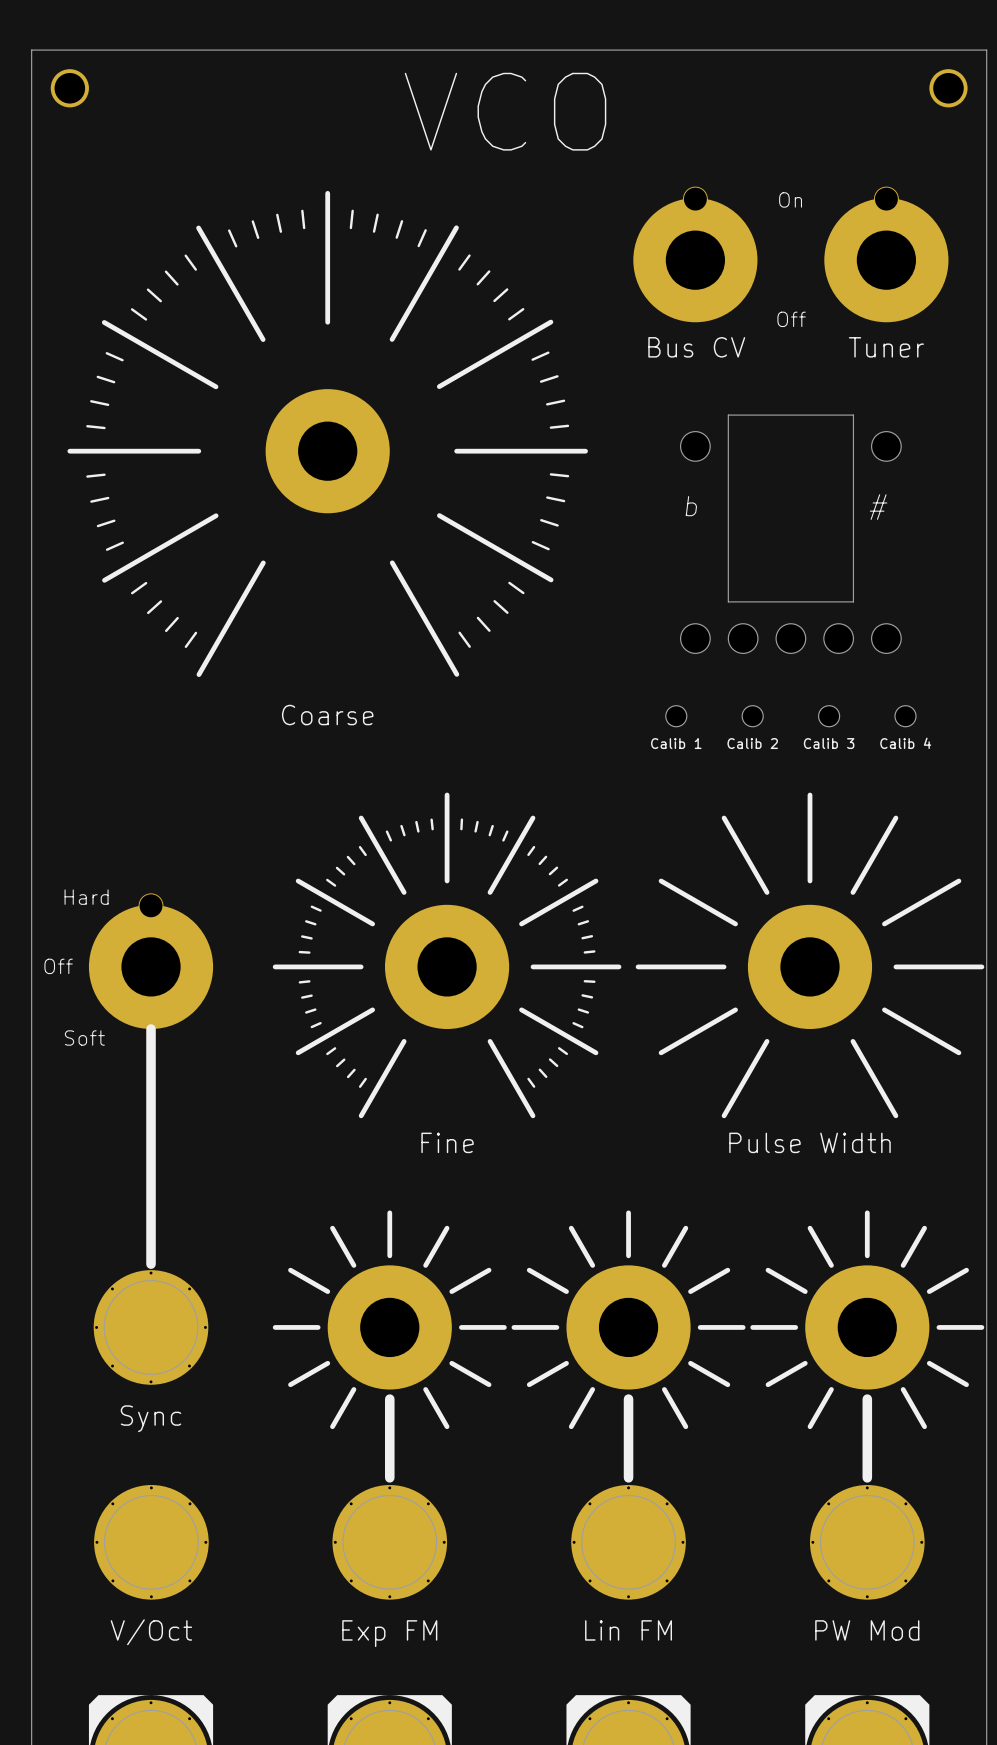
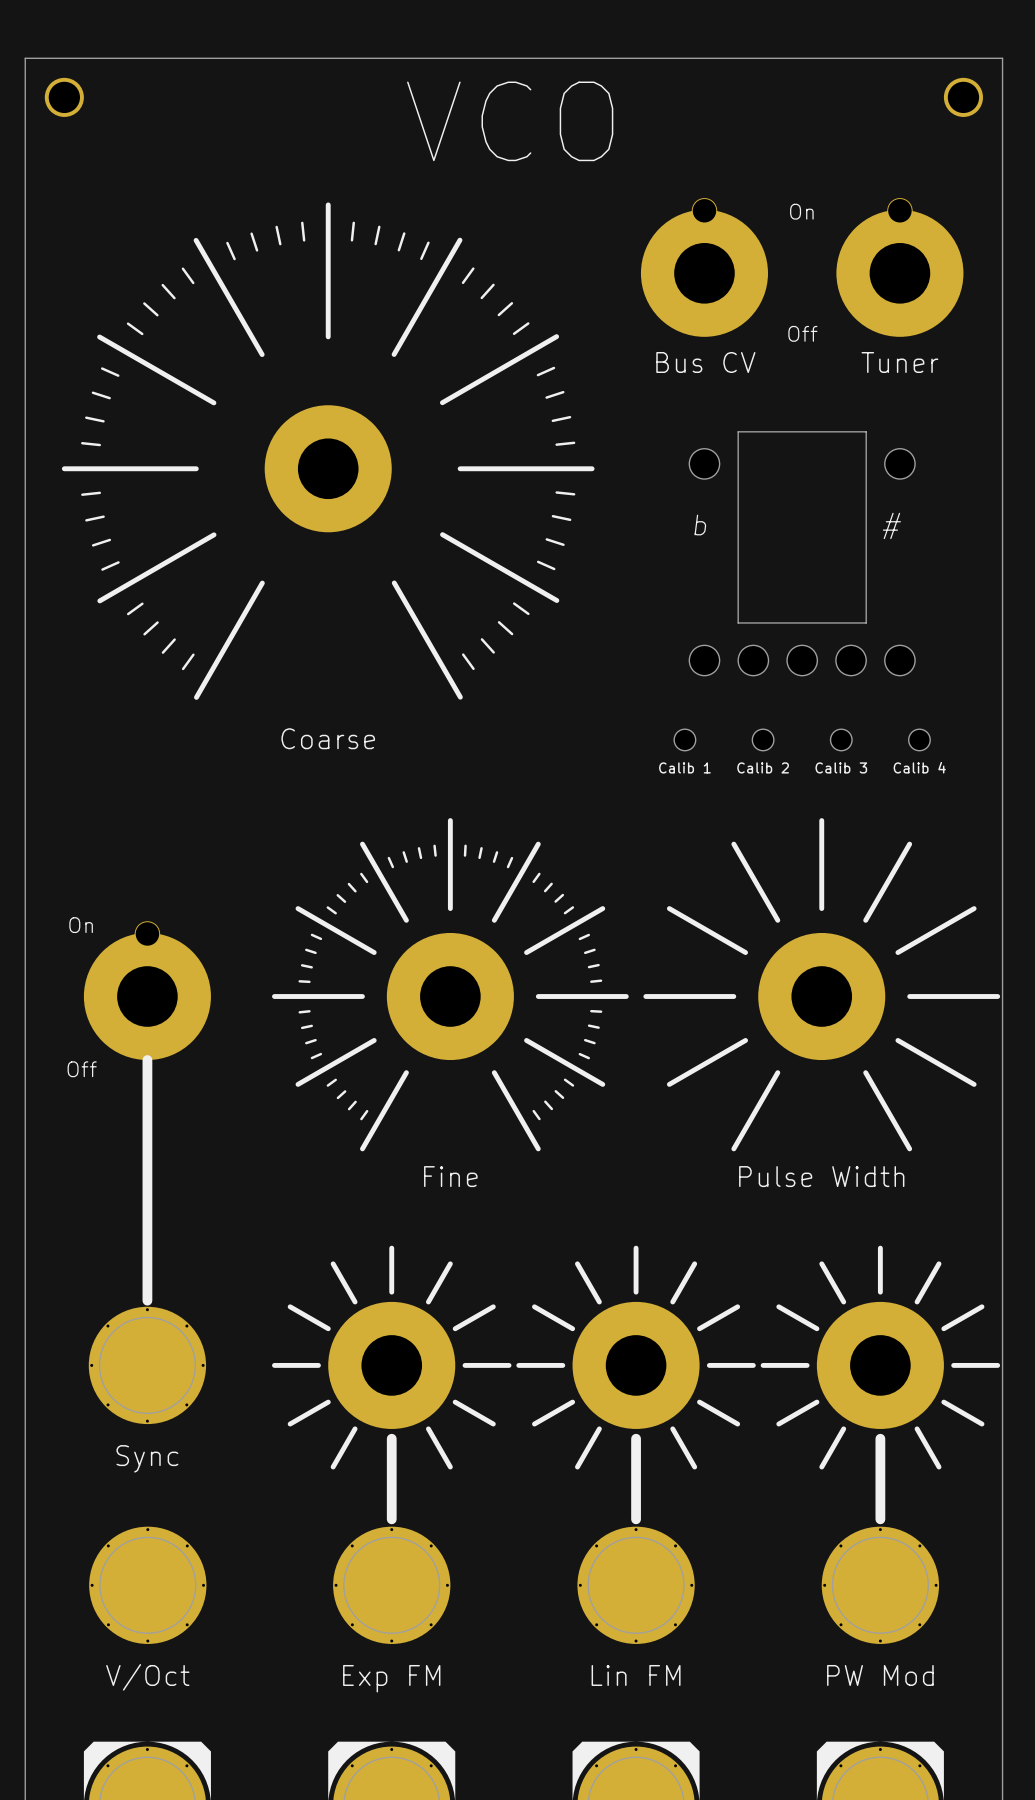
text: Hard (86, 897) -> On (81, 925)
text: Off (58, 966) -> none
text: Soft (84, 1038) -> Off (82, 1069)

